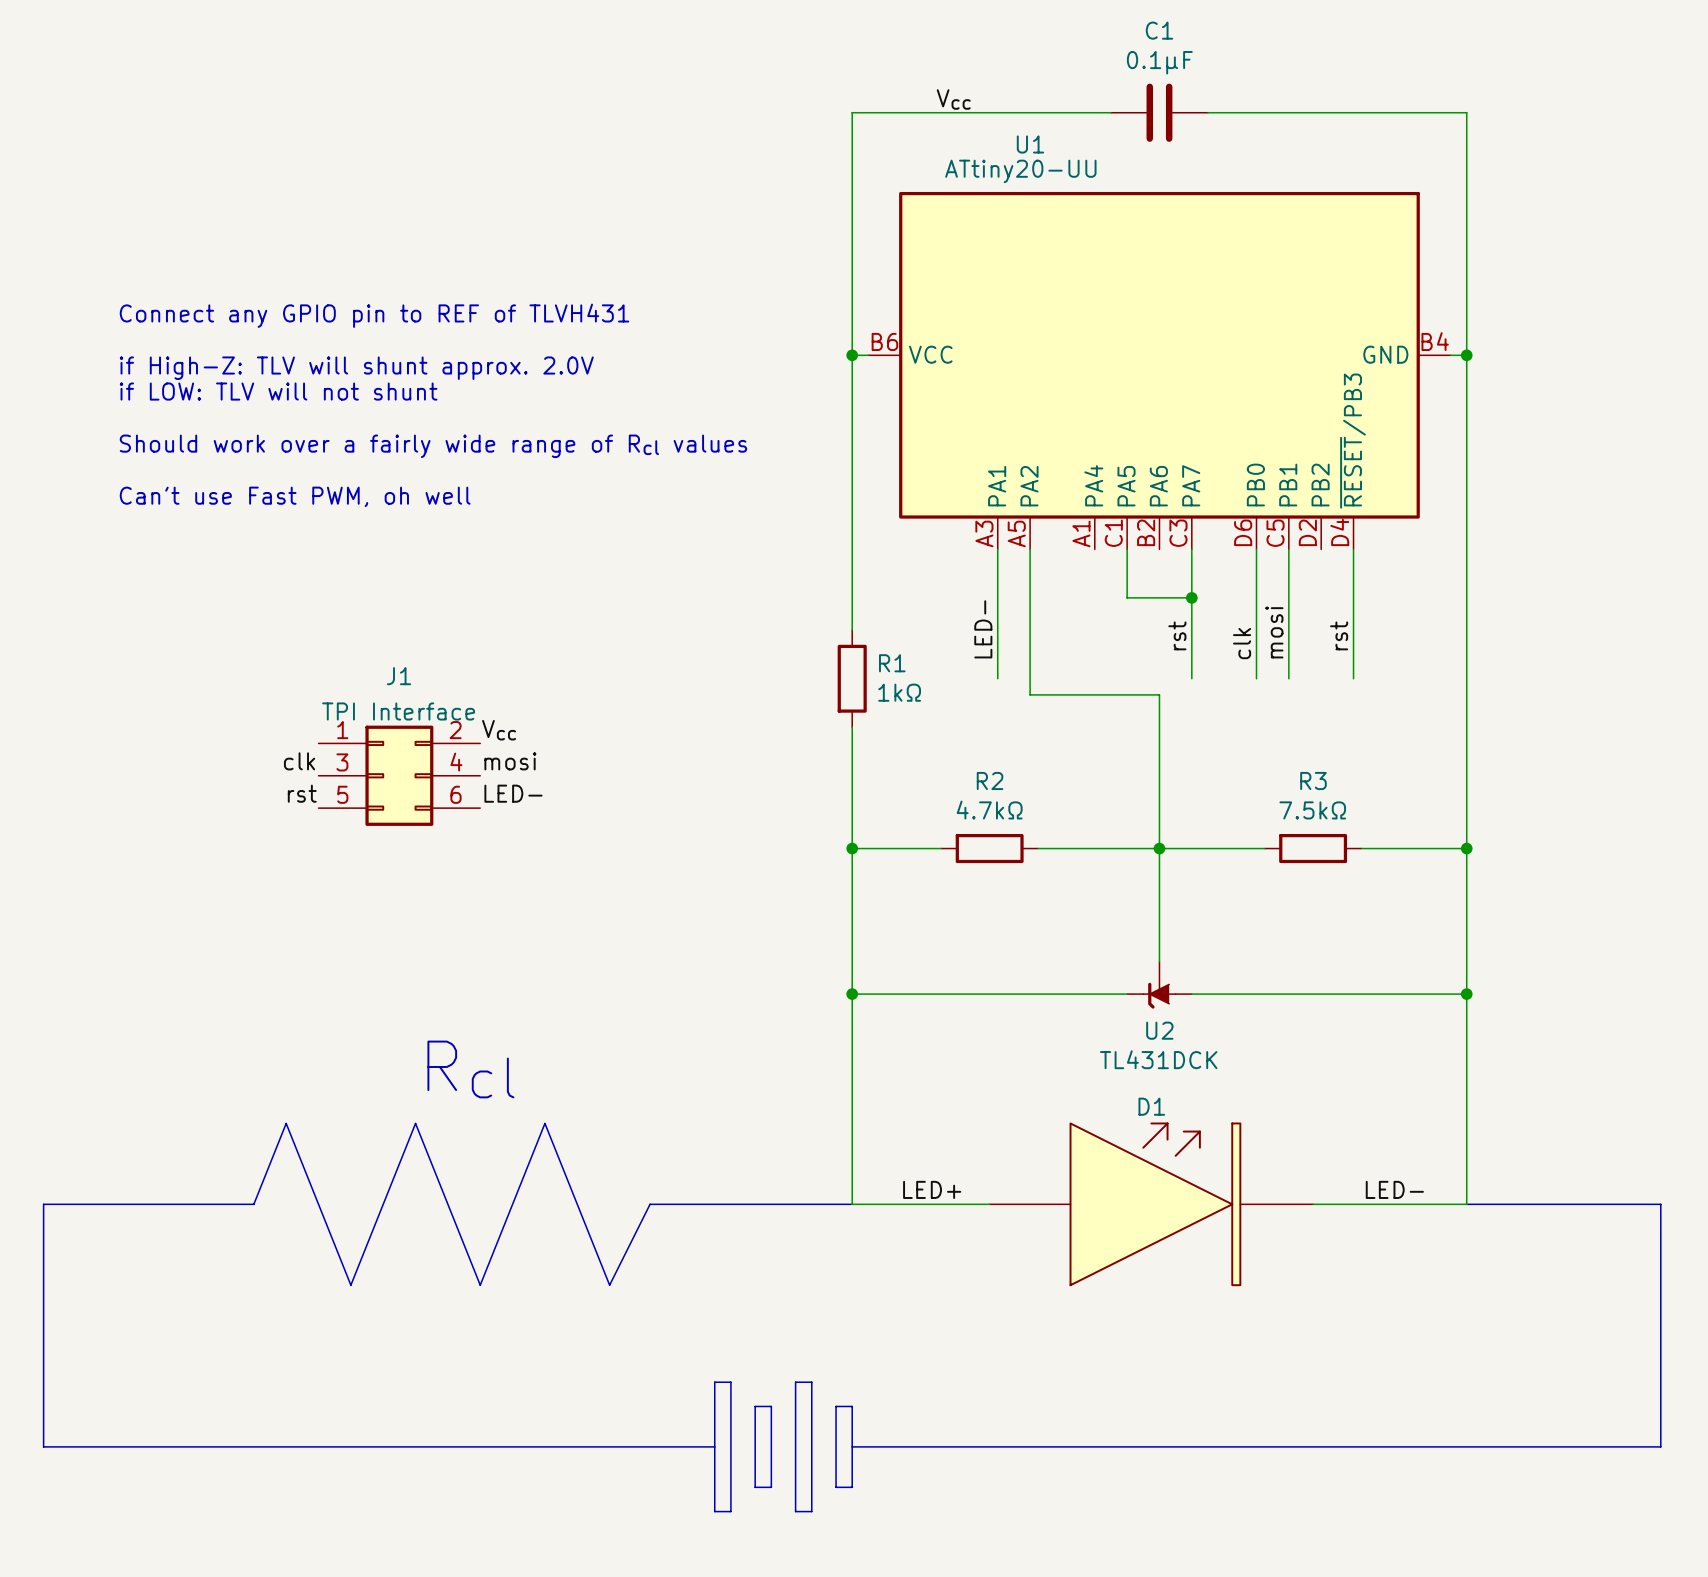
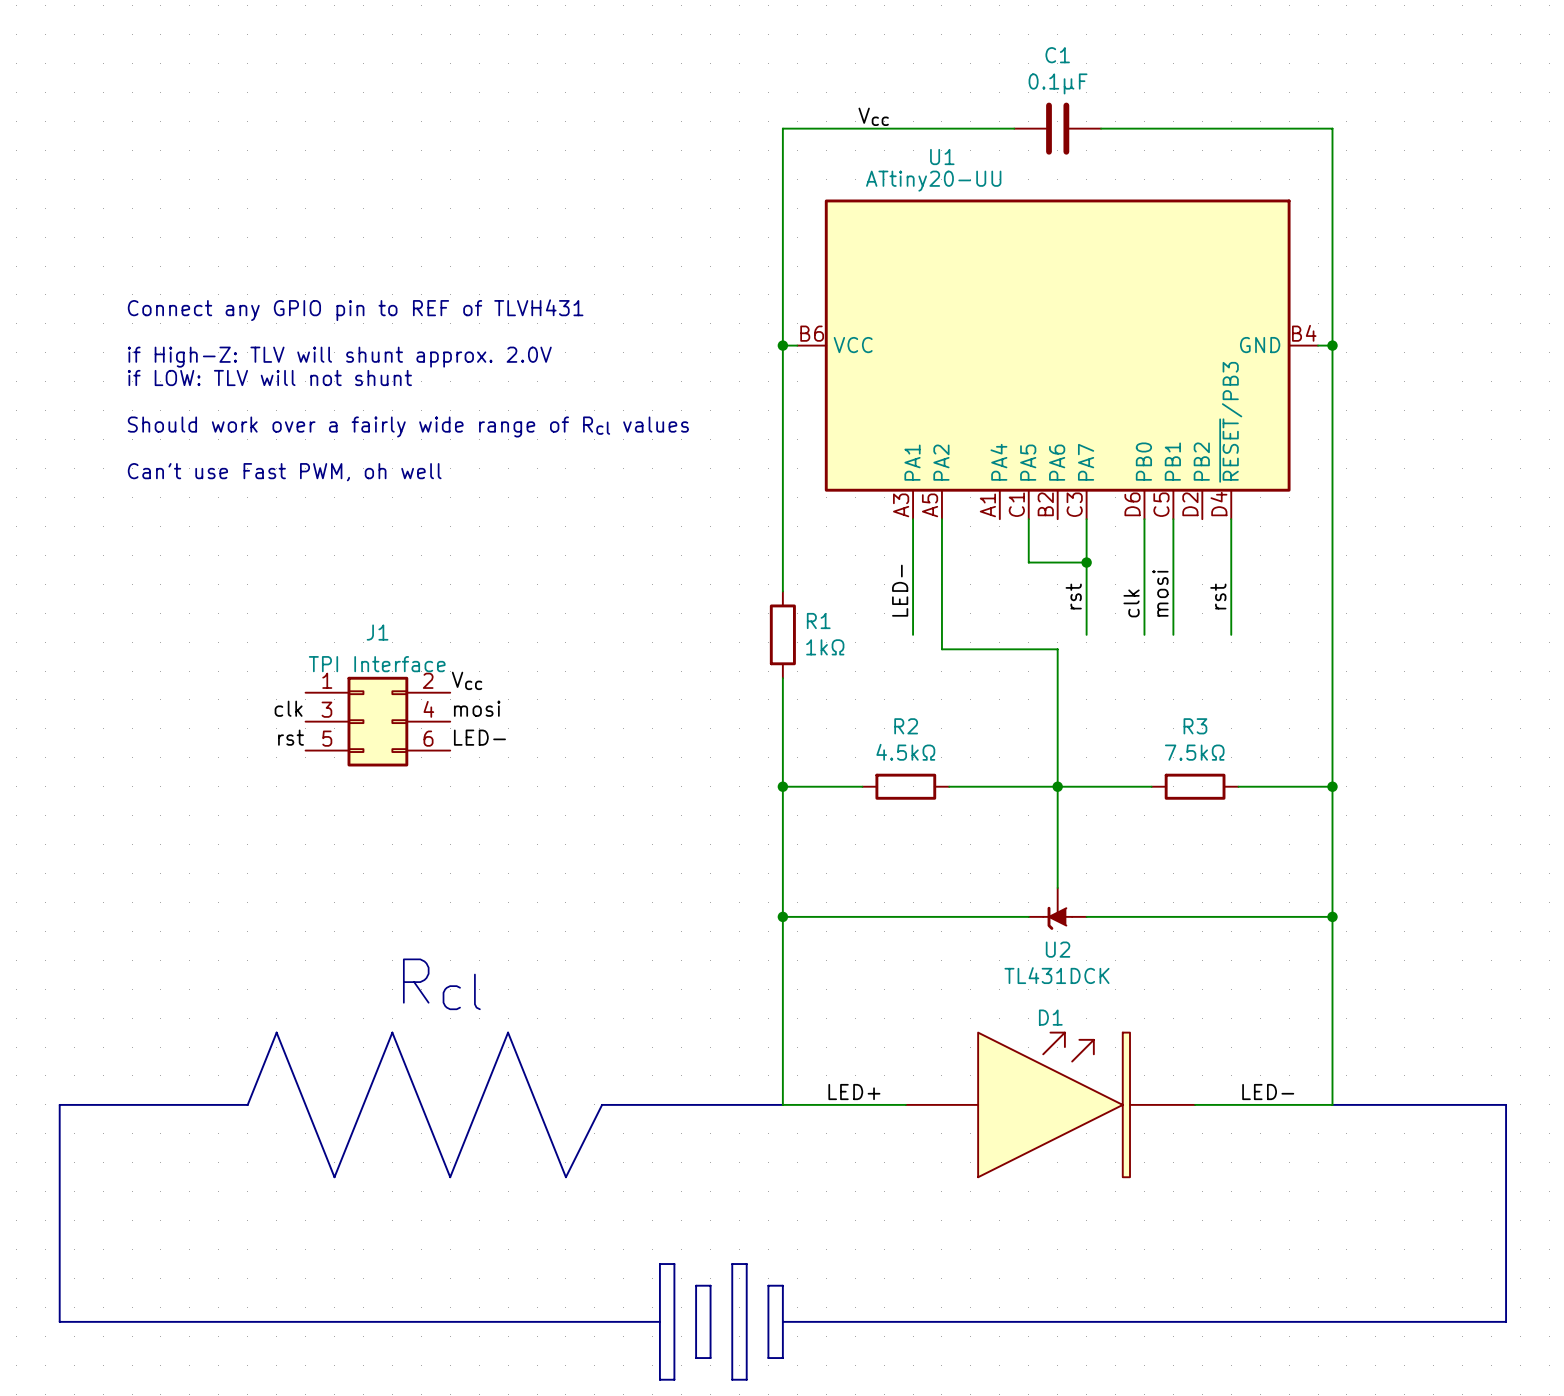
R2 value: 4.7kΩ (989, 810) -> 4.5kΩ (905, 752)

